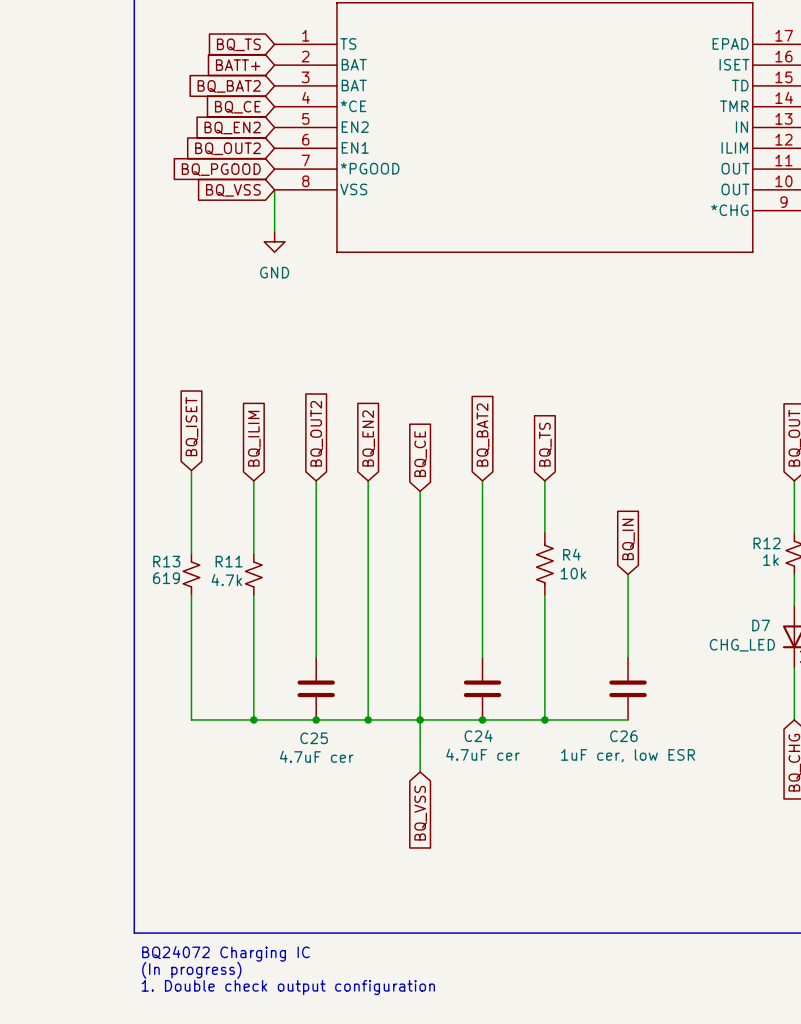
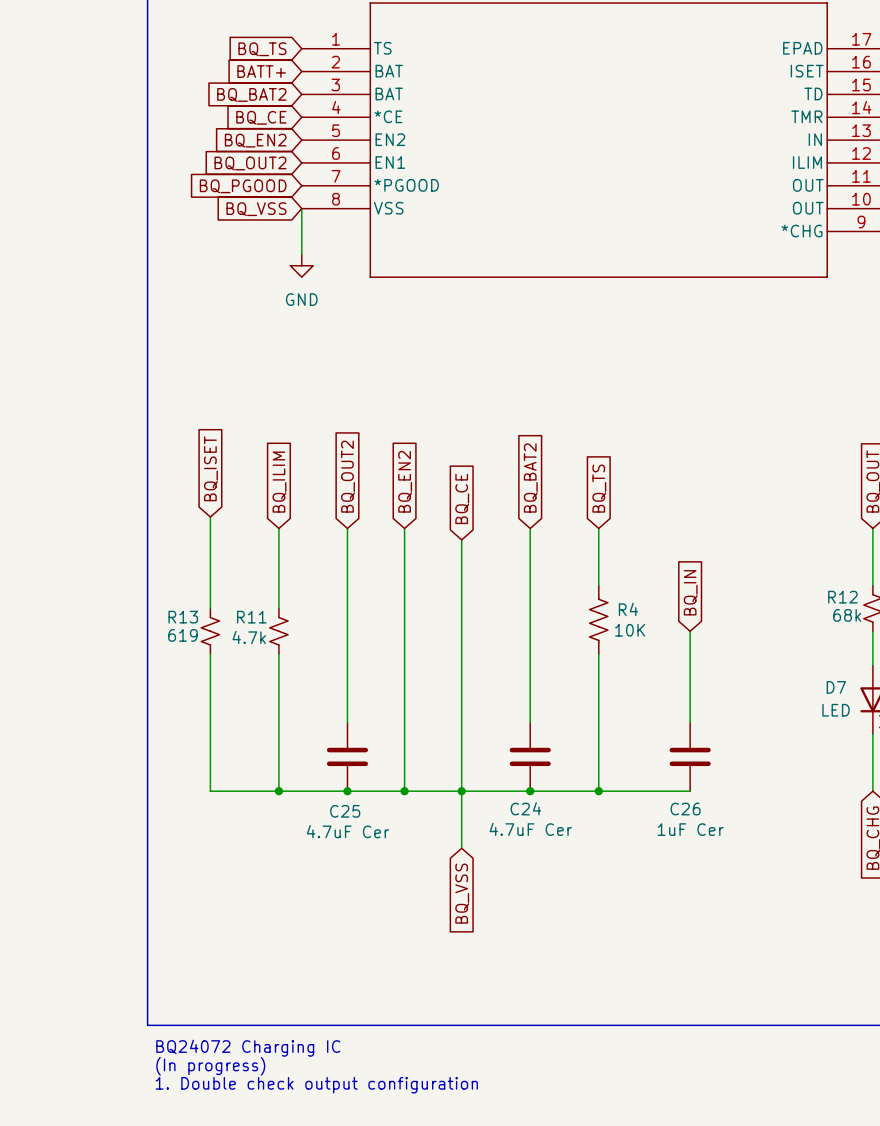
R12 value: 1k (770, 560) -> 68k (847, 615)
R4 value: 10k (573, 573) -> 10K (630, 630)
D7 value: CHG_LED (742, 645) -> LED (836, 710)
C24 value: 4.7uF cer (483, 754) -> 4.7uF Cer (530, 829)
C26 value: 1uF cer, low ESR (628, 755) -> 1uF Cer (690, 829)
C25 value: 4.7uF cer (316, 756) -> 4.7uF Cer (348, 831)

